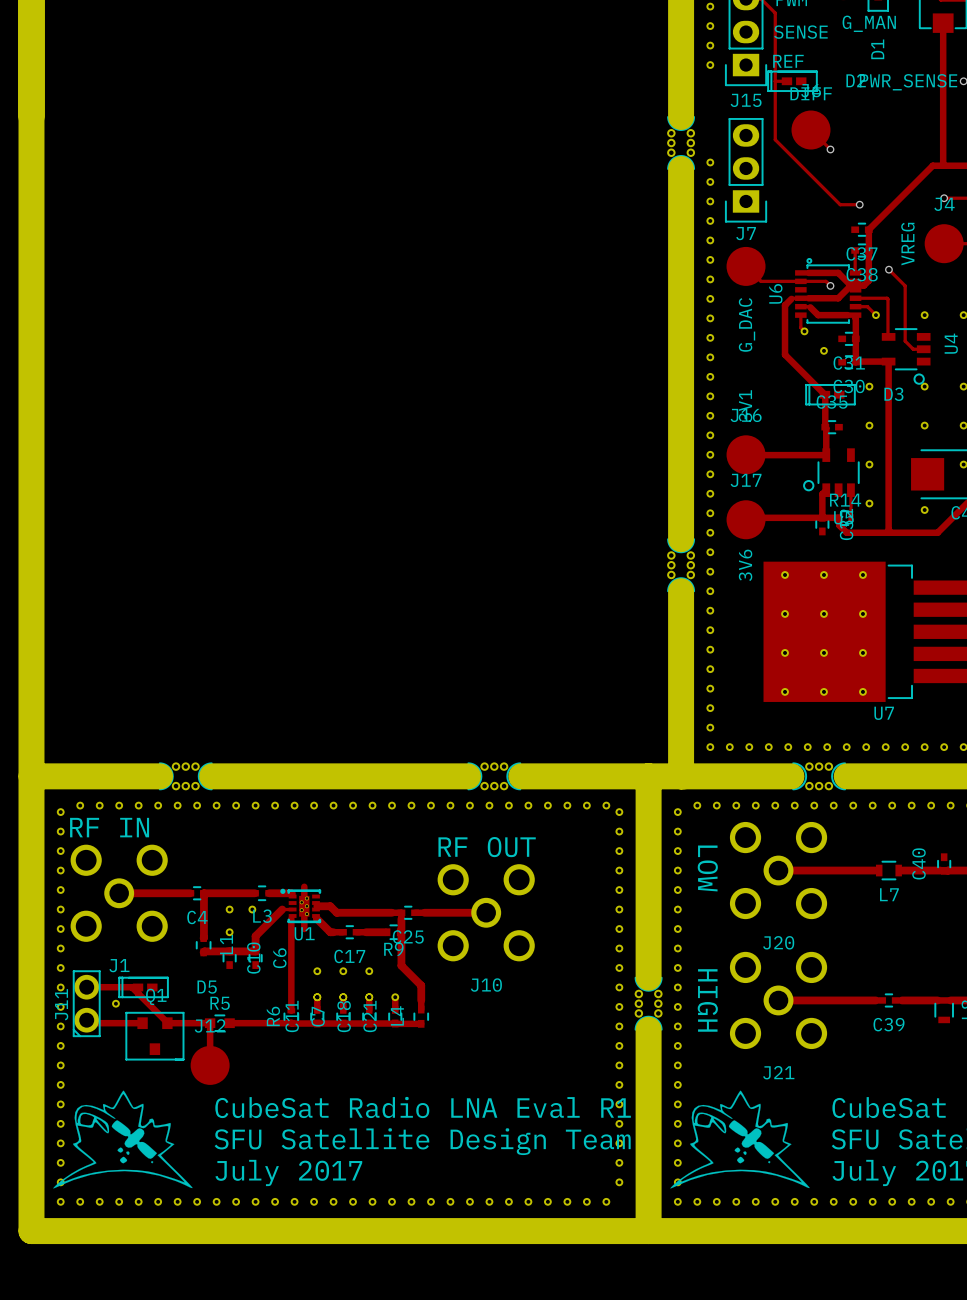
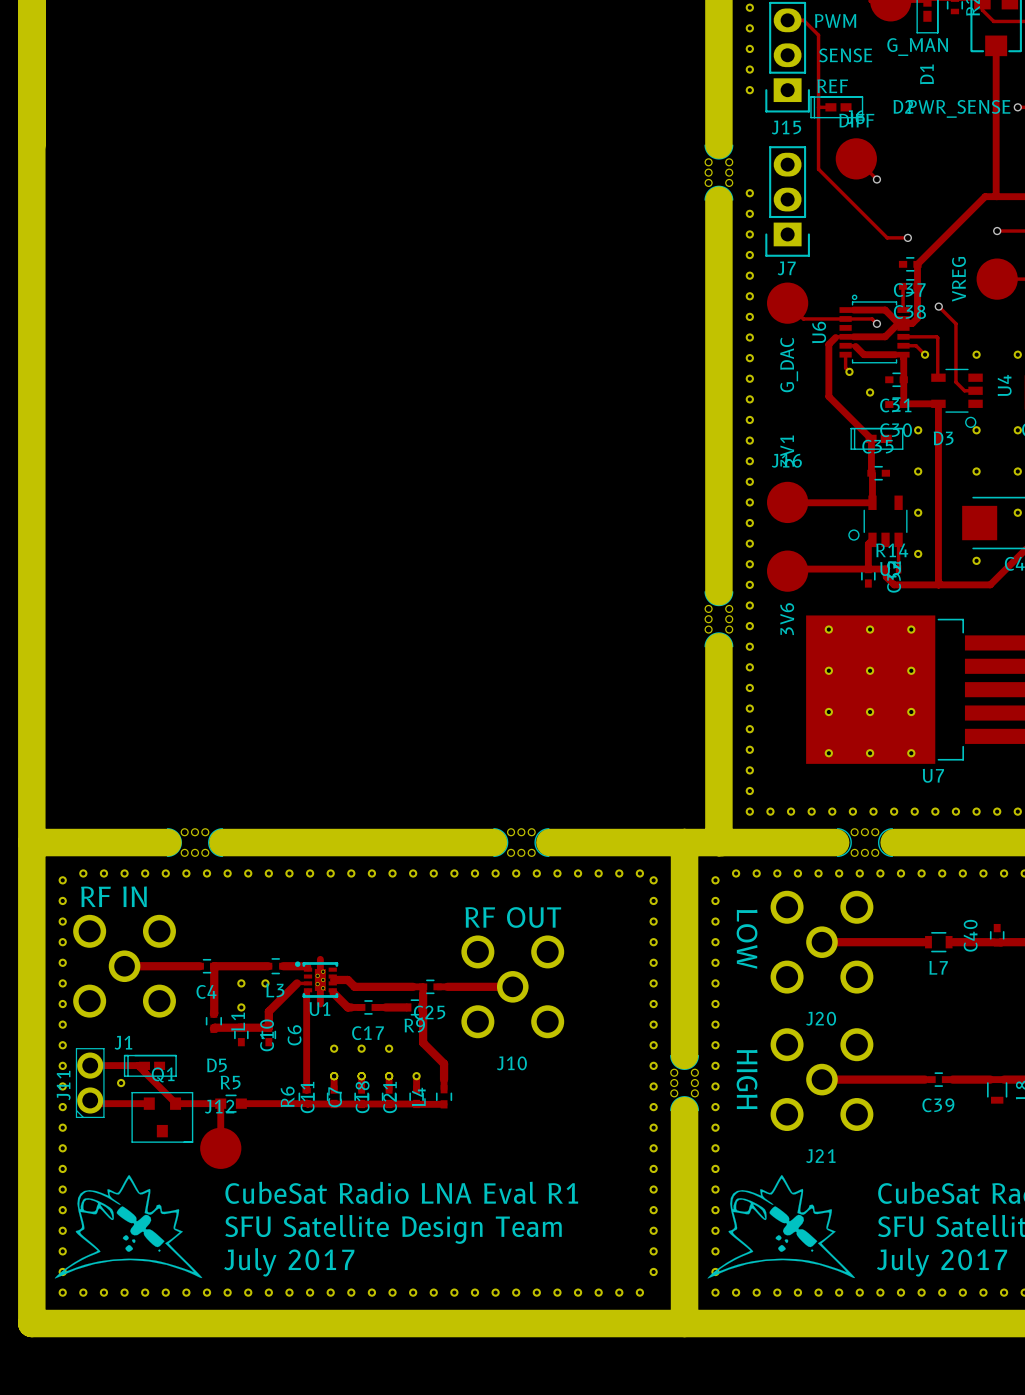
J4 name: J4 (944, 204) -> none
J17 name: J17 (746, 480) -> none

